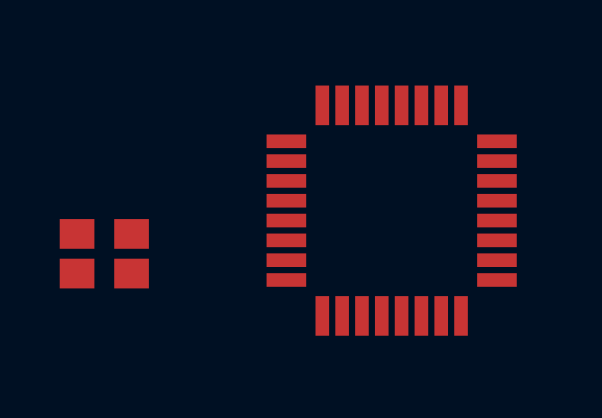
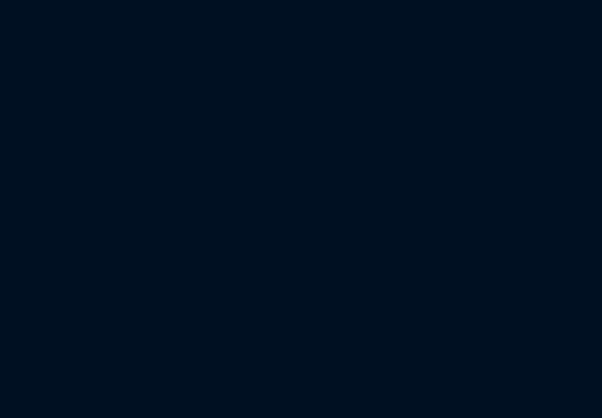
part: (391, 210) -> none
part: (104, 253) -> none

